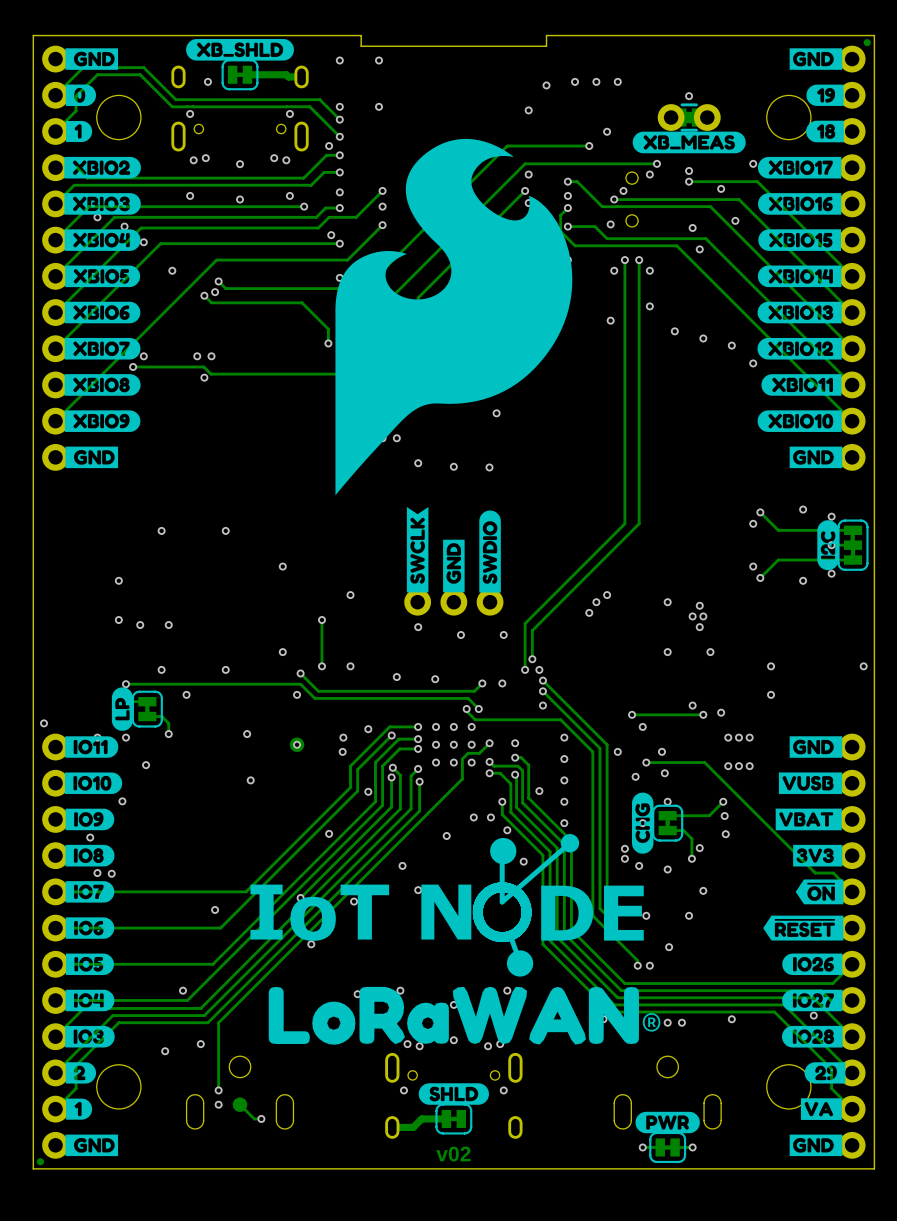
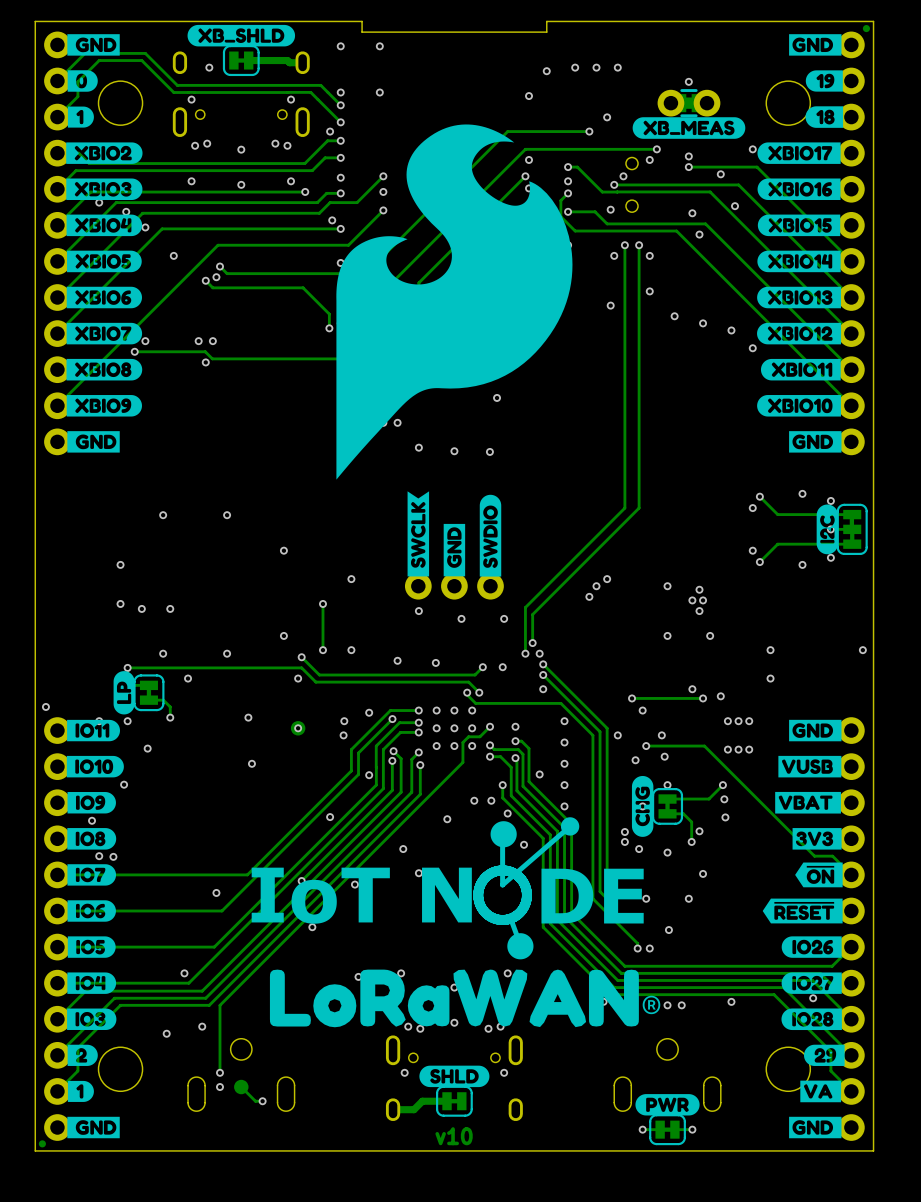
text: v02 (453, 1154) -> v10 (454, 1136)

